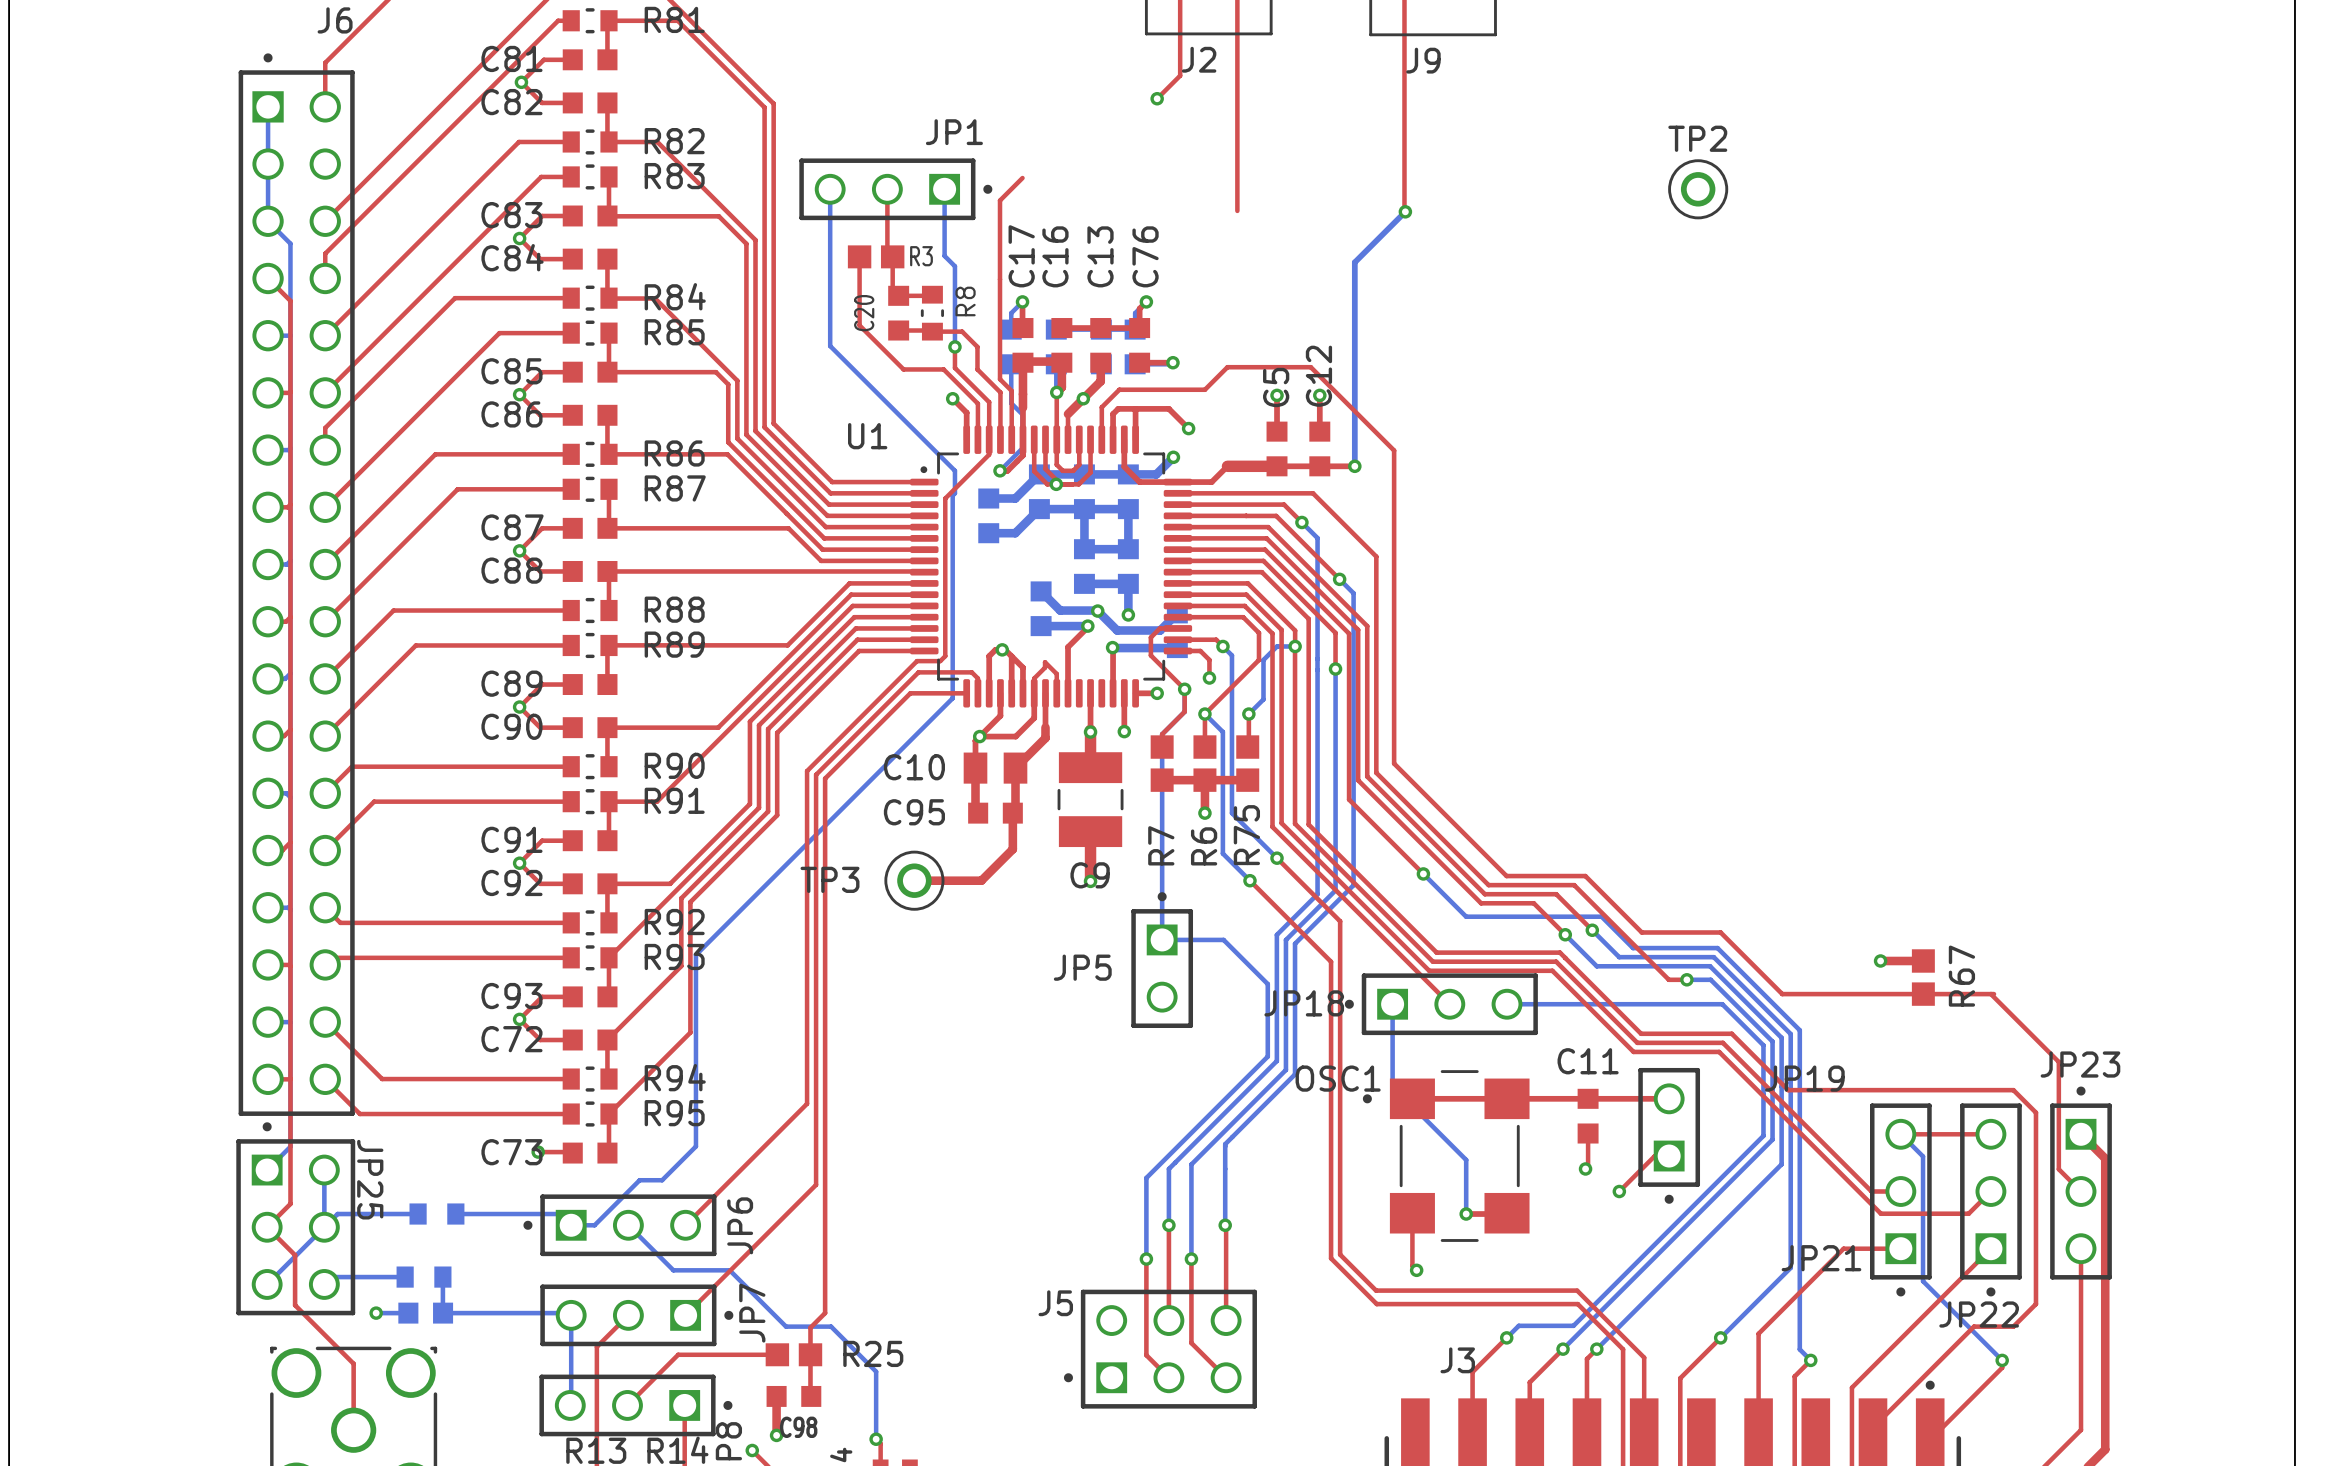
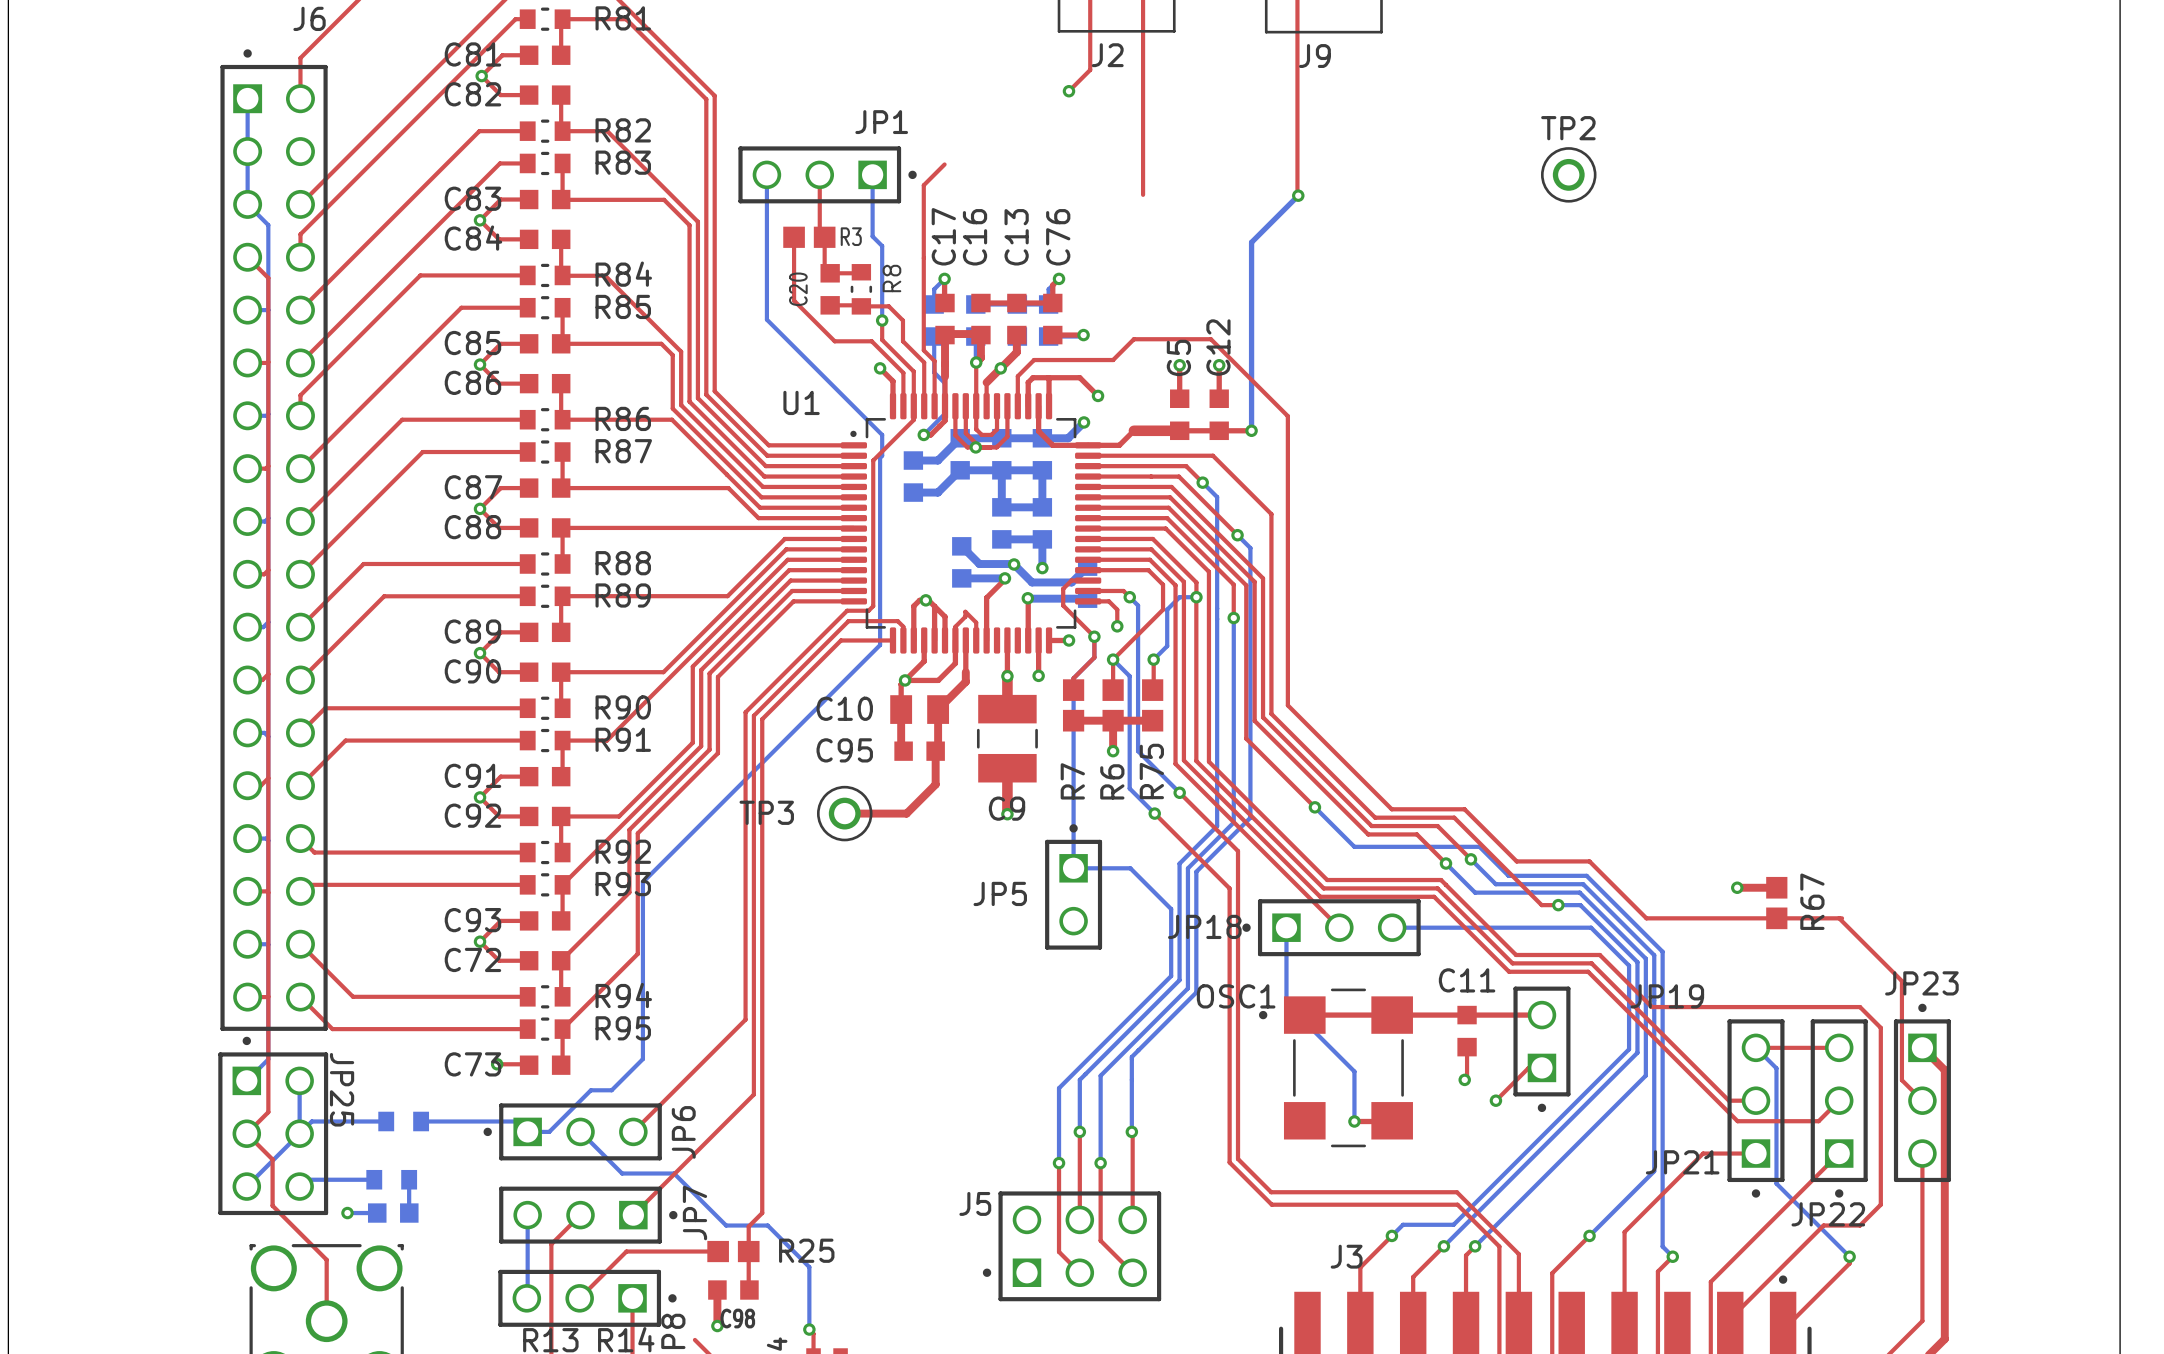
top track: (1412, 1213) (1412, 1266) (1416, 1270) -> none
via: (1416, 1270) -> none
bottom track: (443, 1313) (568, 1313) (571, 1315) -> none
via: (752, 1450) -> none

